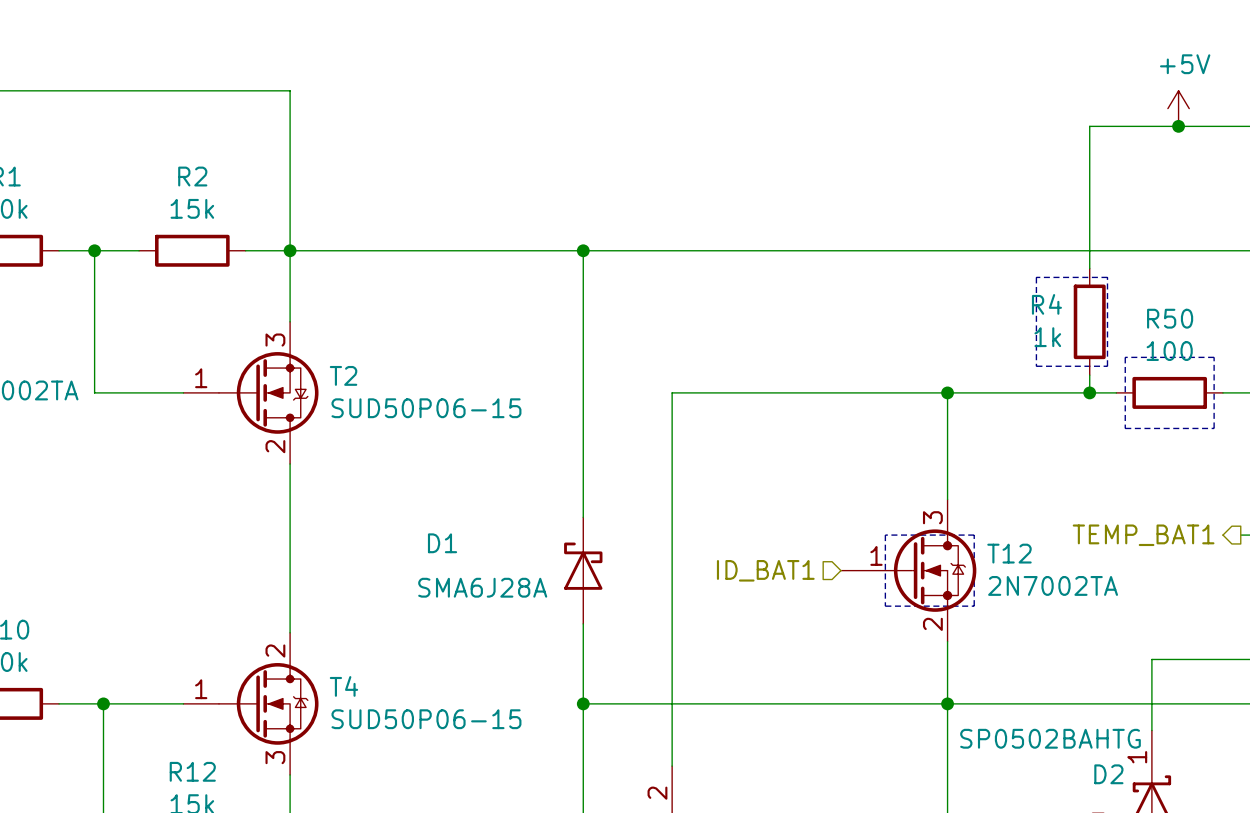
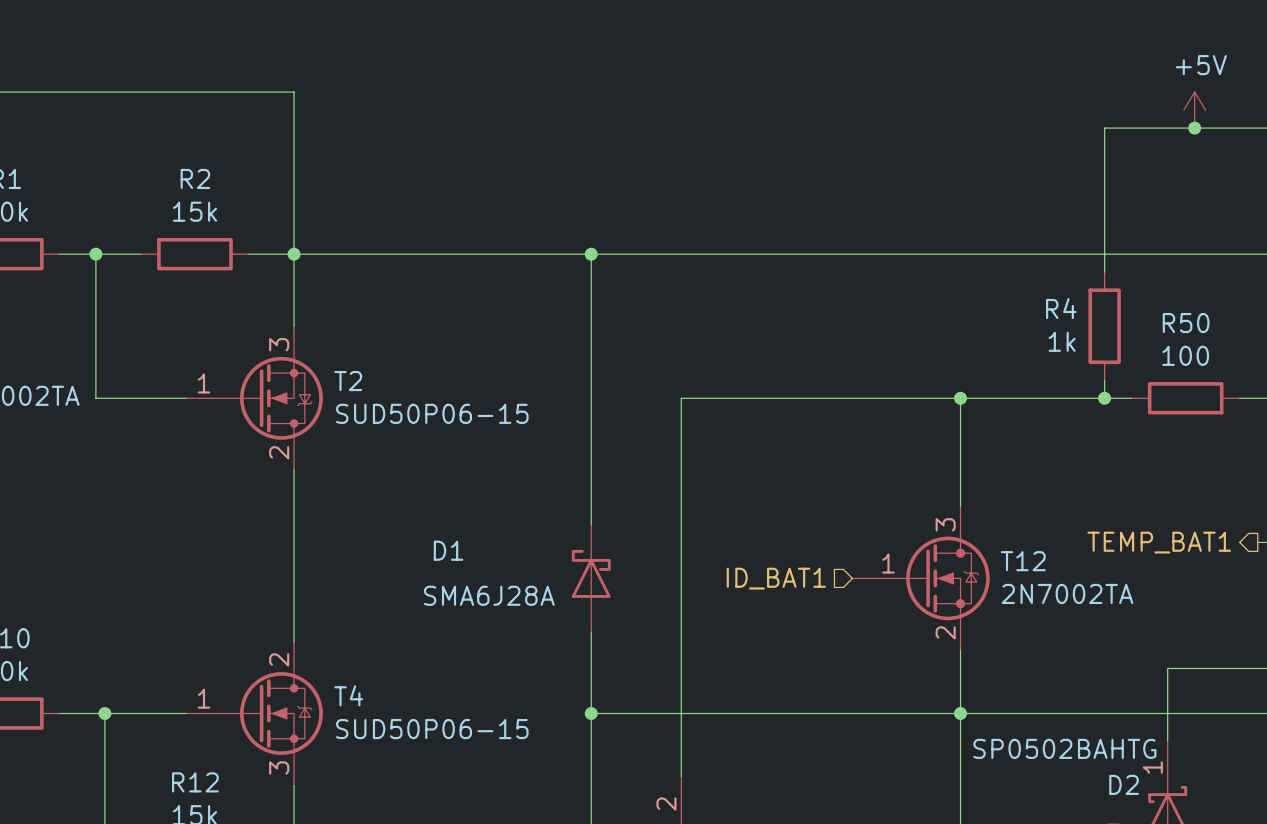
line: (1036, 277) (1036, 366) (1107, 366) (1107, 277) (1036, 277) -> none
line: (1125, 357) (1214, 357) (1214, 428) (1125, 428) (1125, 357) -> none
line: (885, 535) (974, 535) (974, 606) (885, 606) (885, 535) -> none

